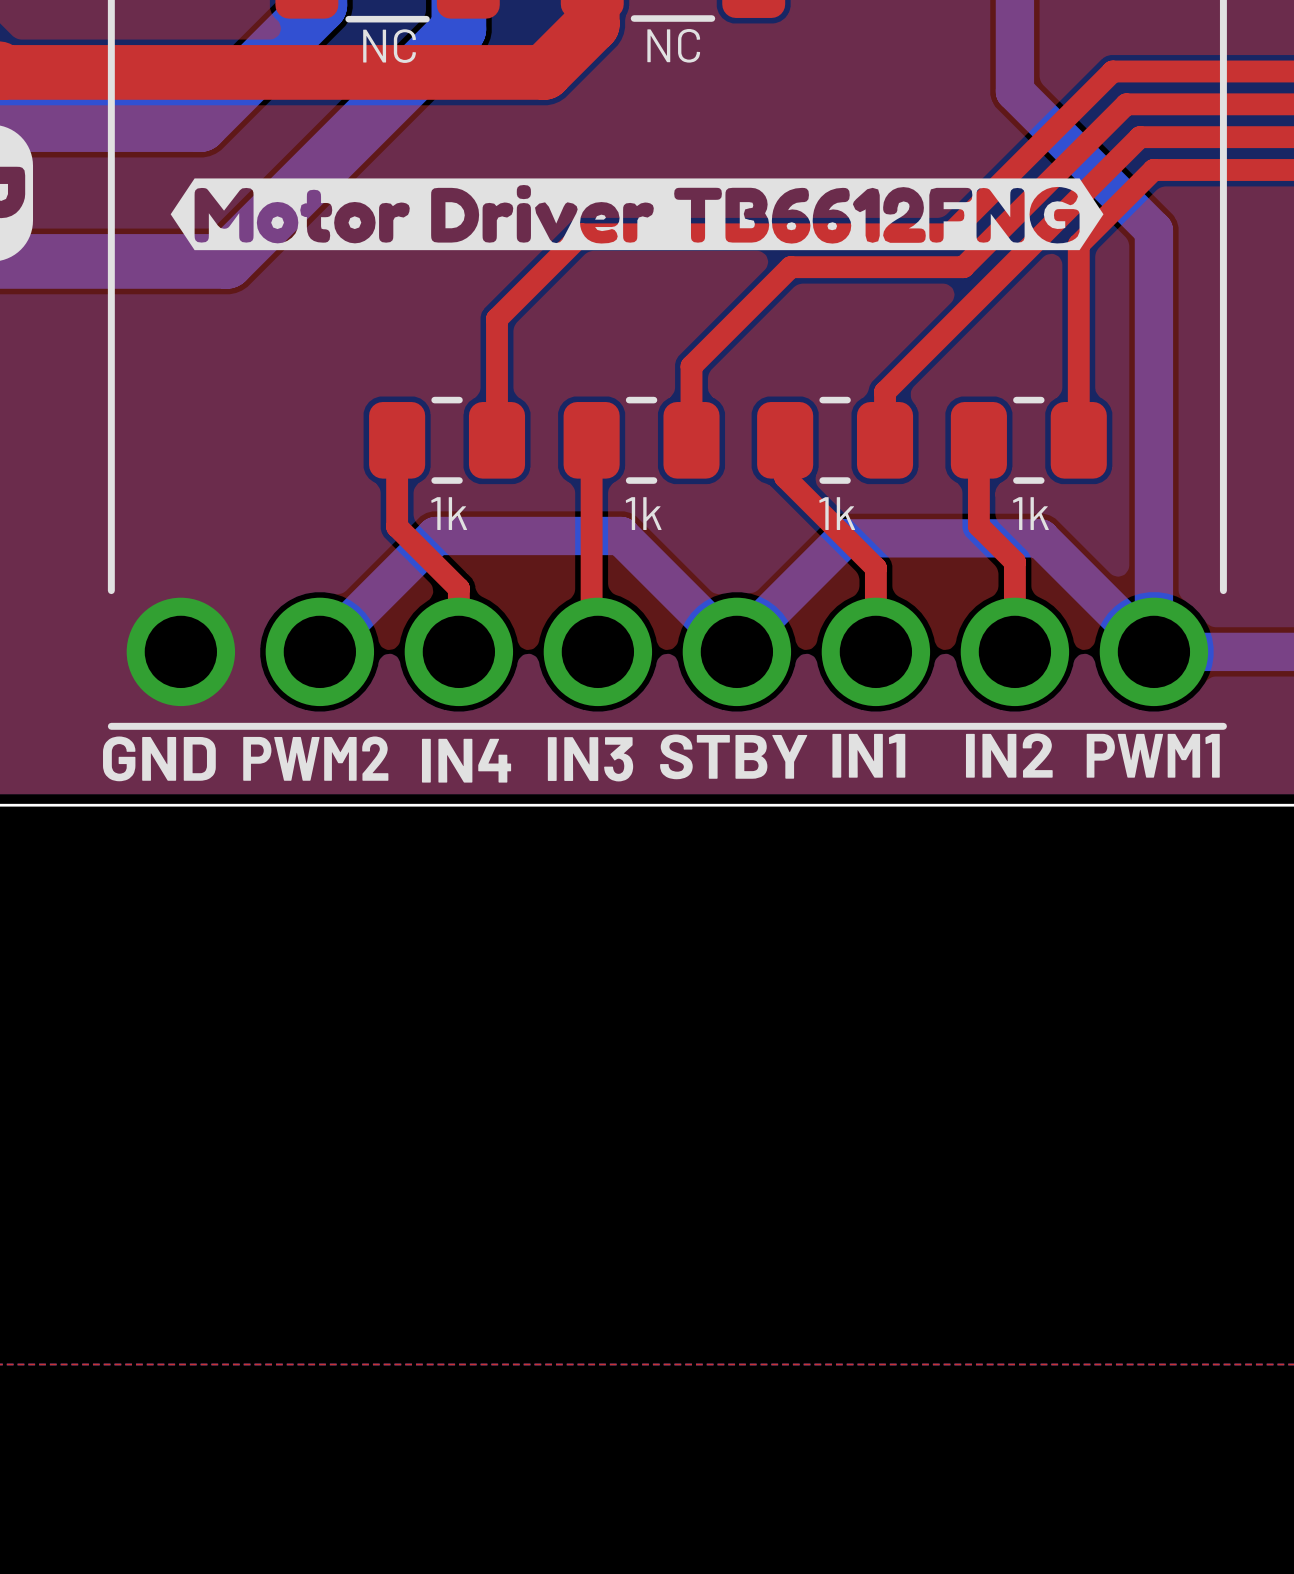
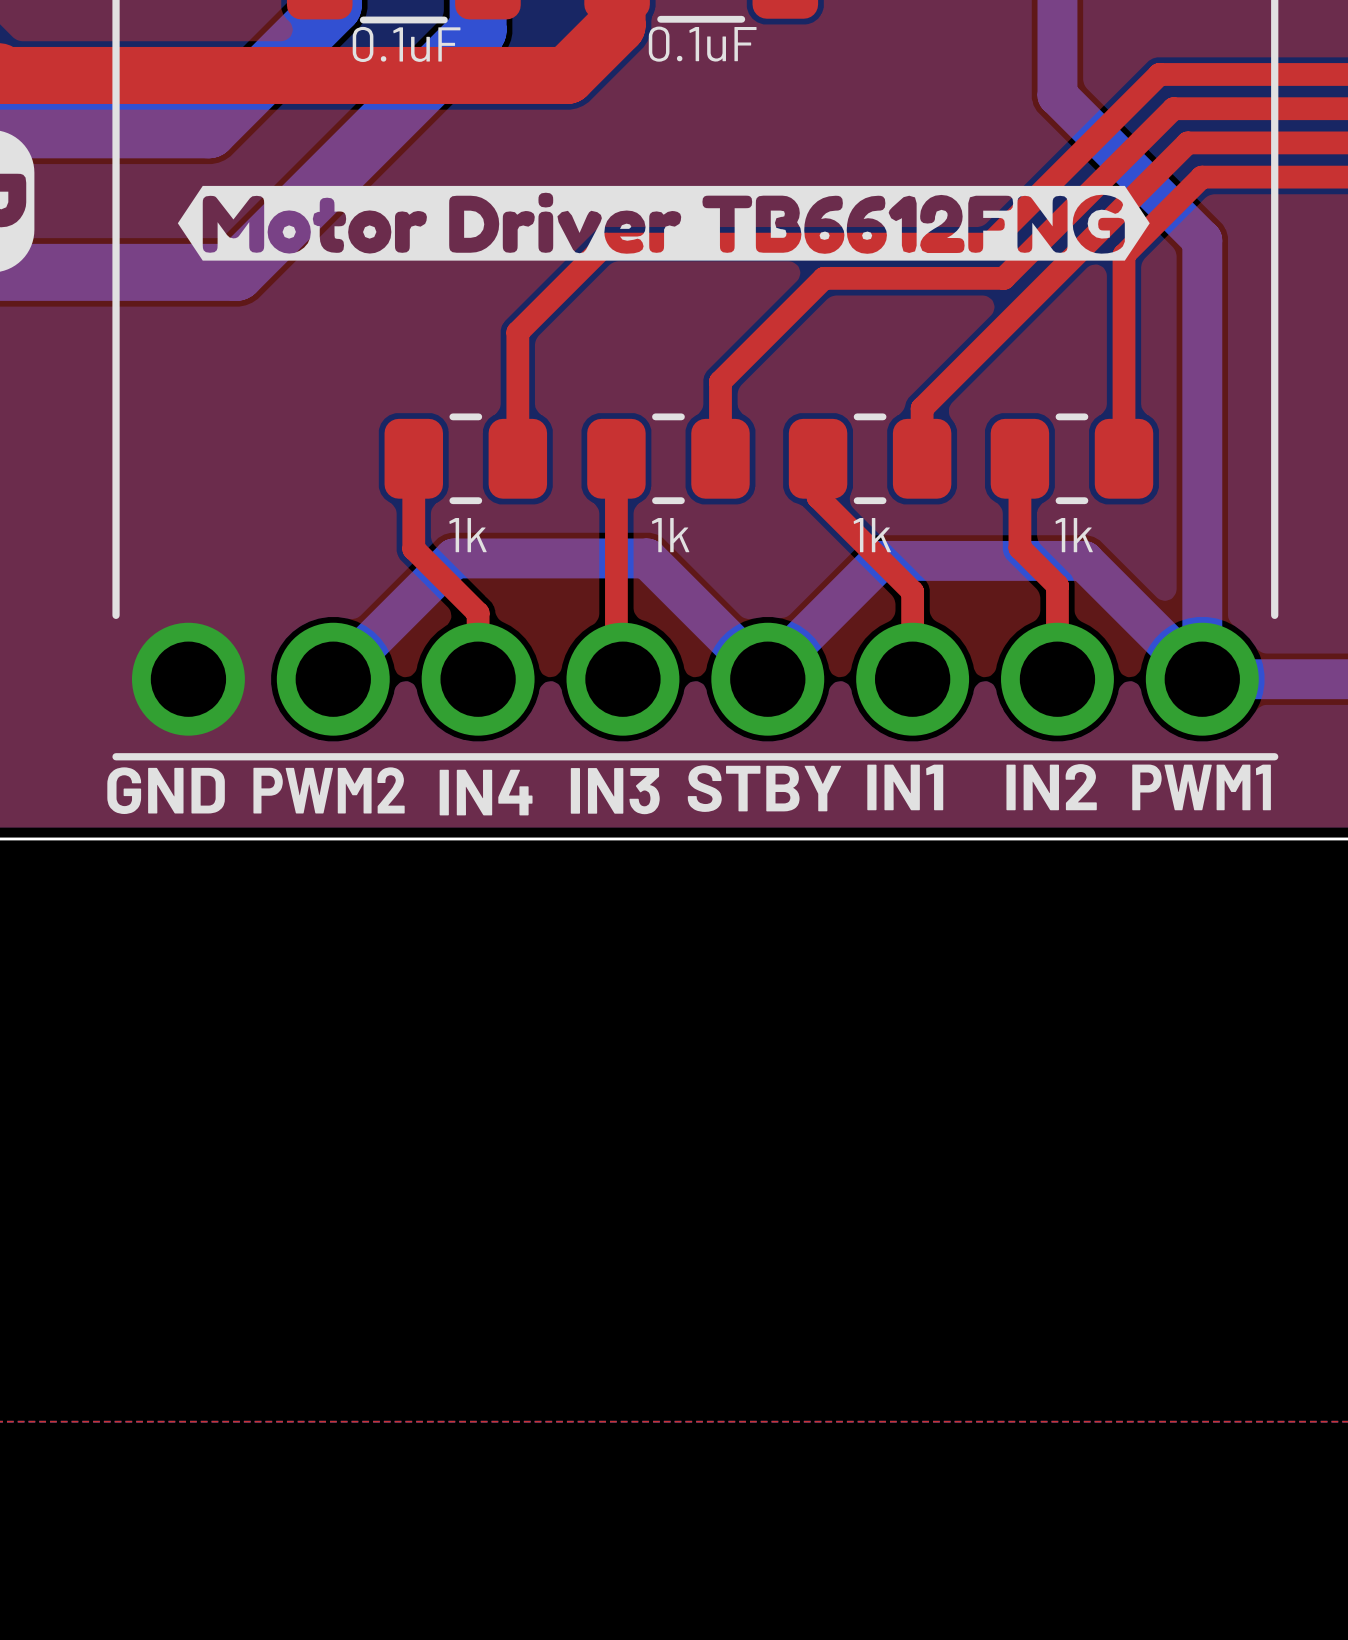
part value: NC (673, 45) -> 0.1uF (702, 44)
part value: NC (389, 46) -> 0.1uF (406, 44)

